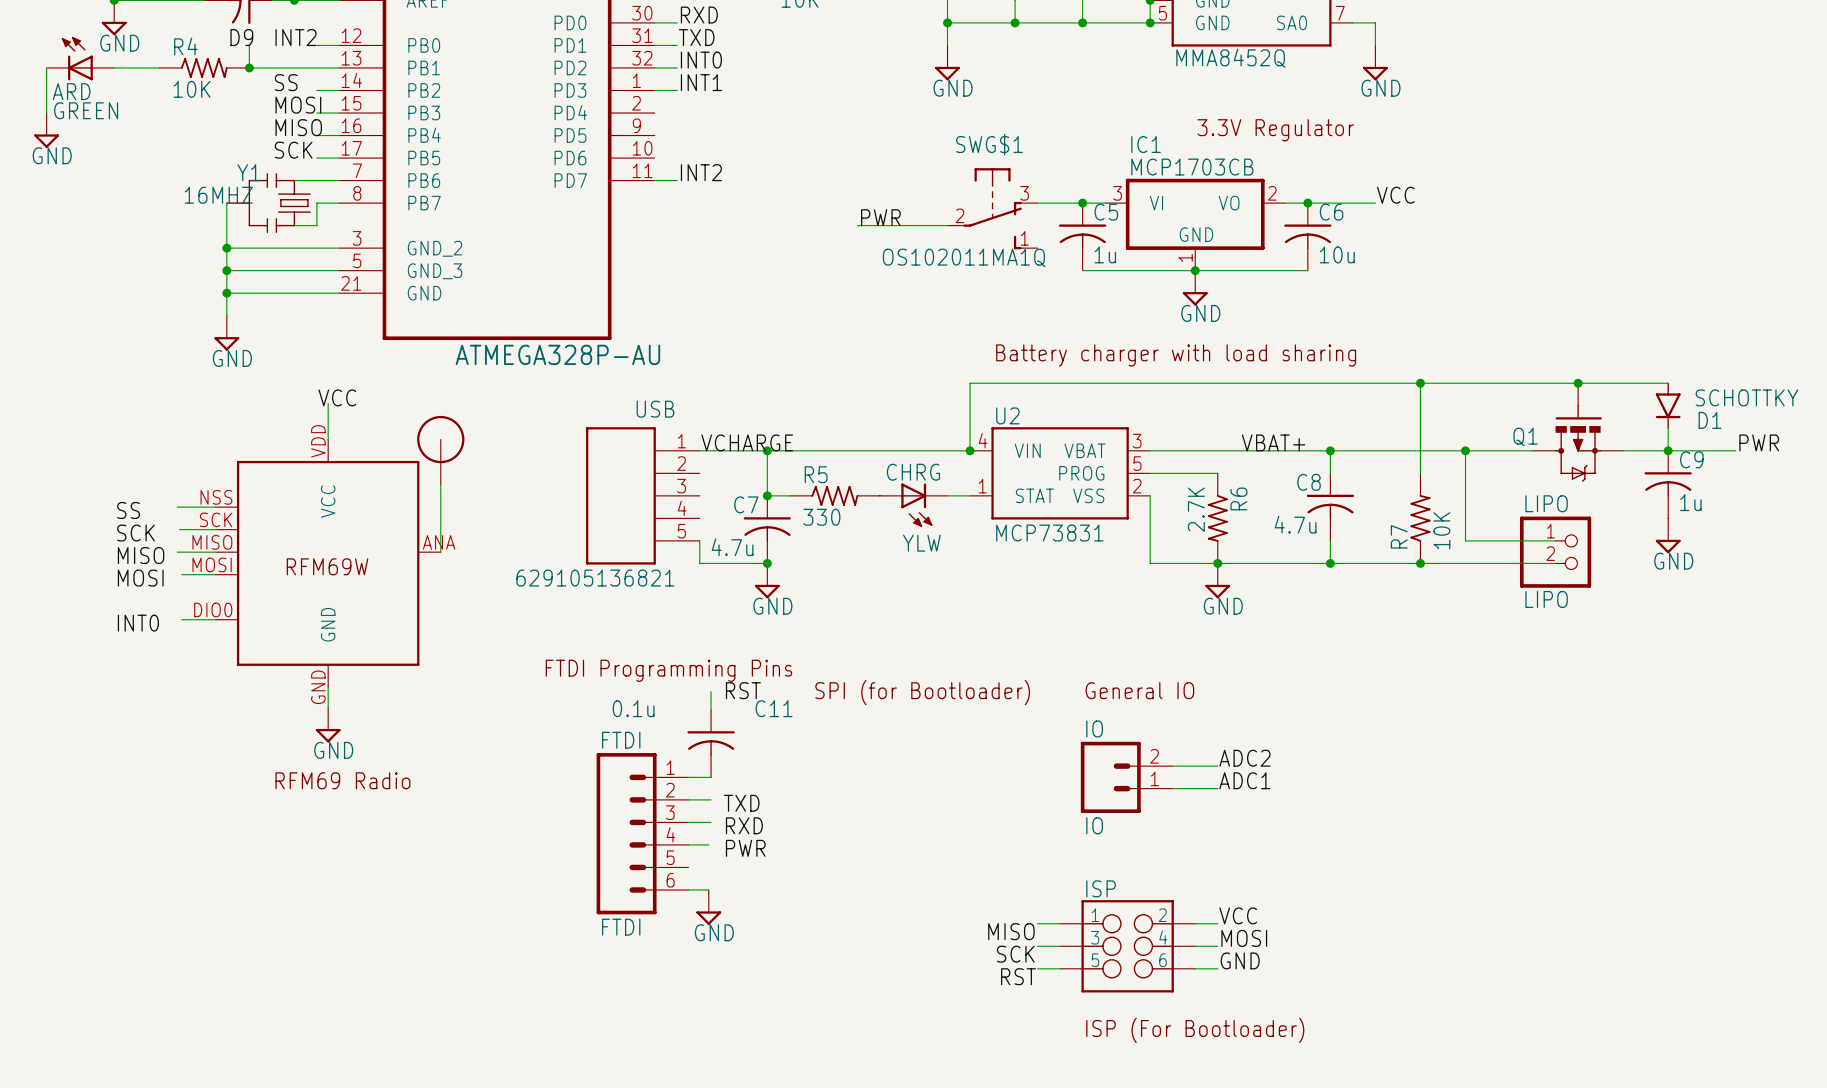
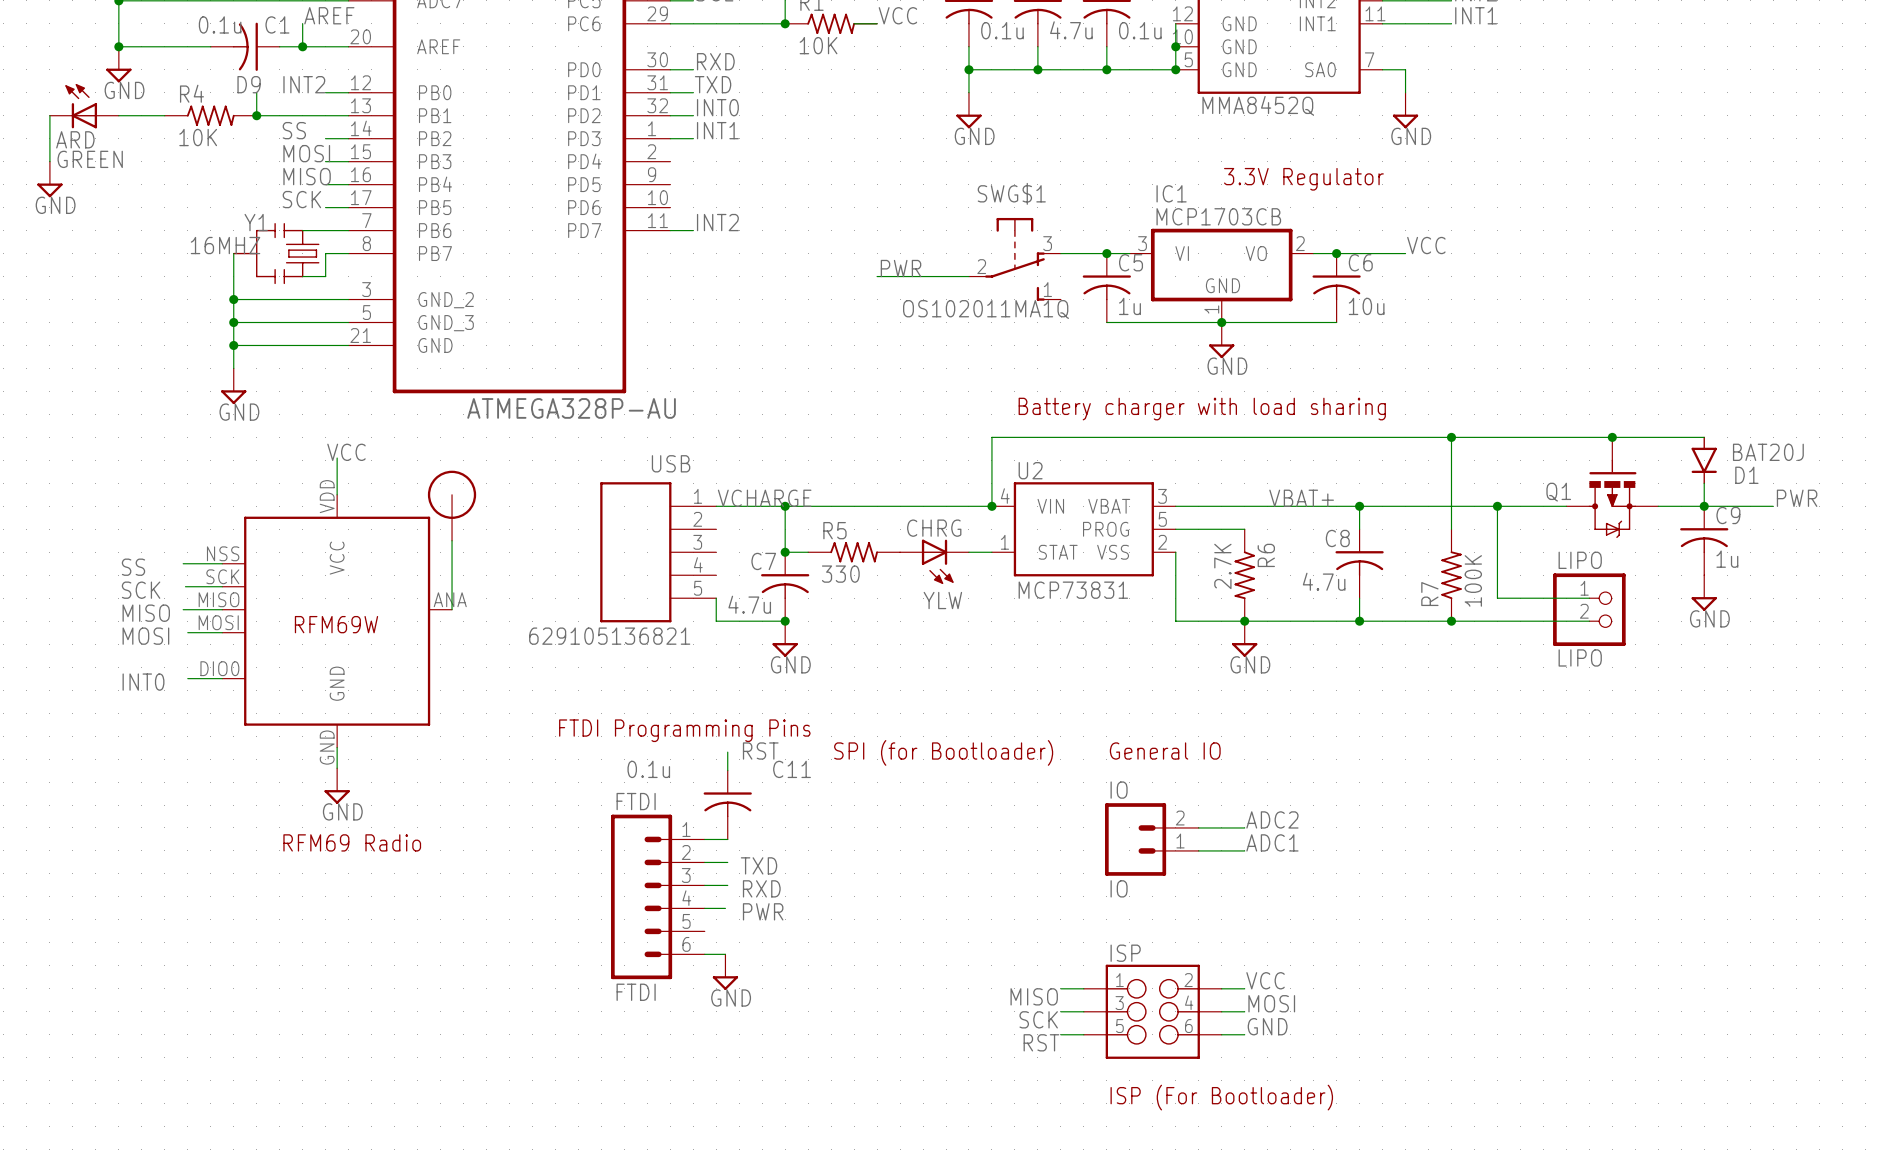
D1 value: SCHOTTKY (1746, 397) -> BAT20J (1768, 452)
R7 value: 10K (1441, 530) -> 100K (1473, 580)

